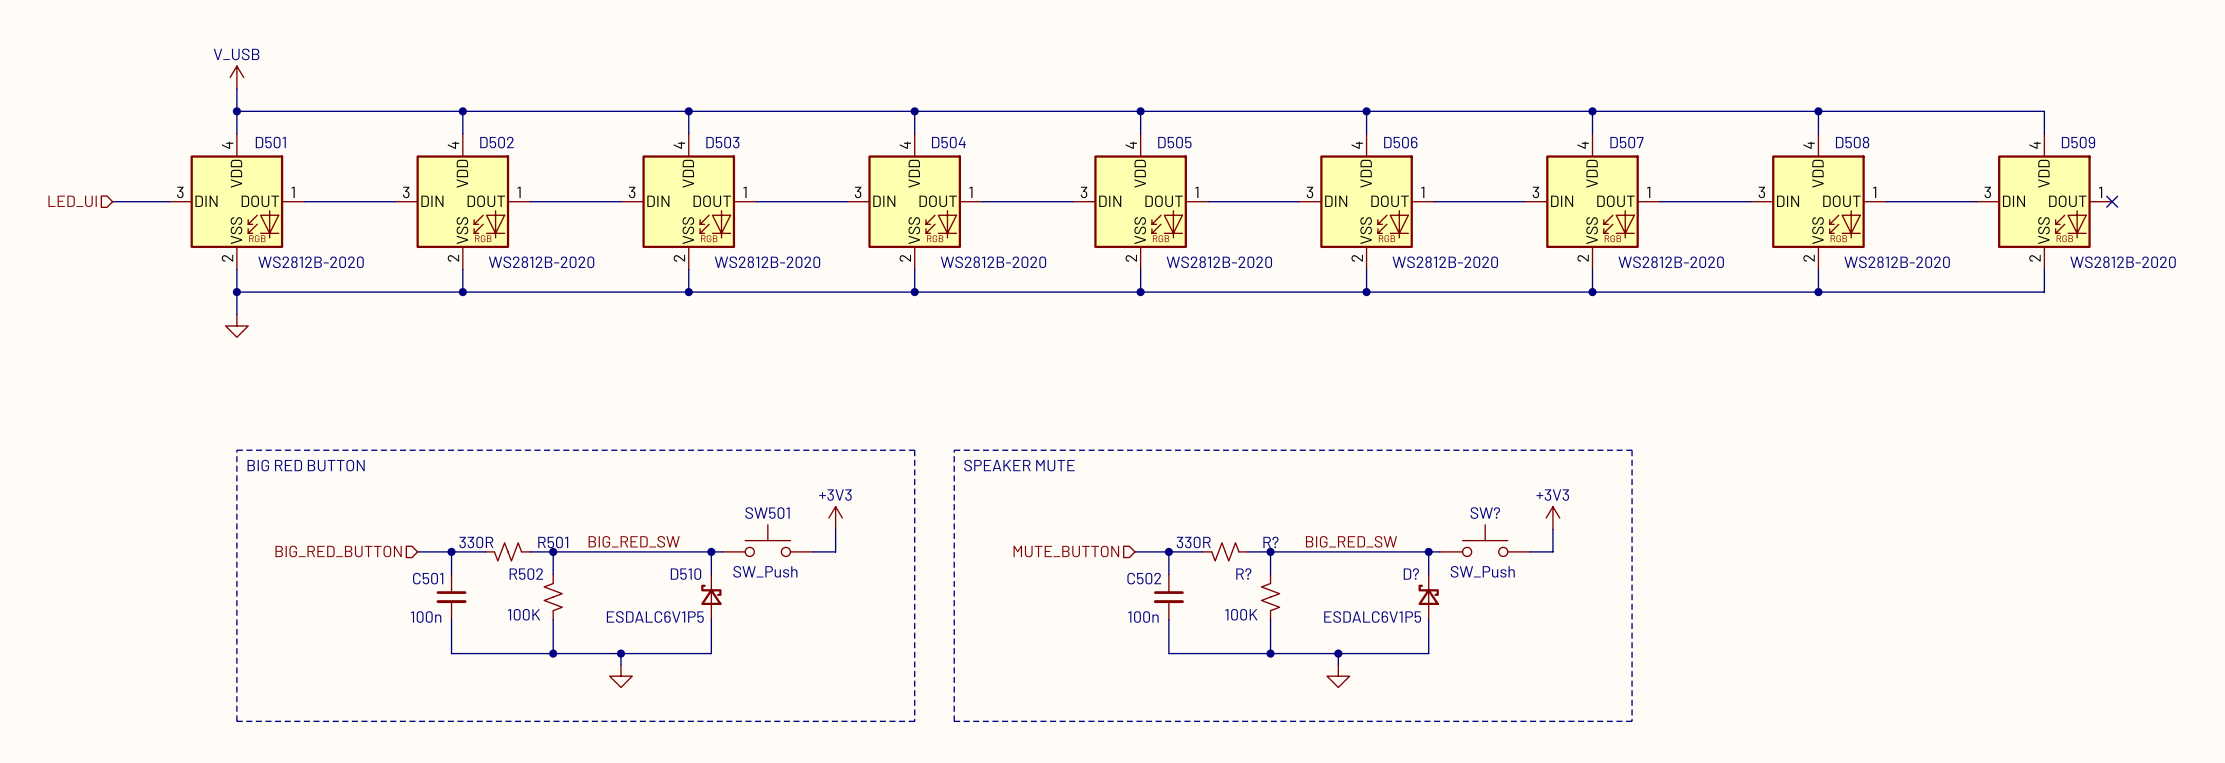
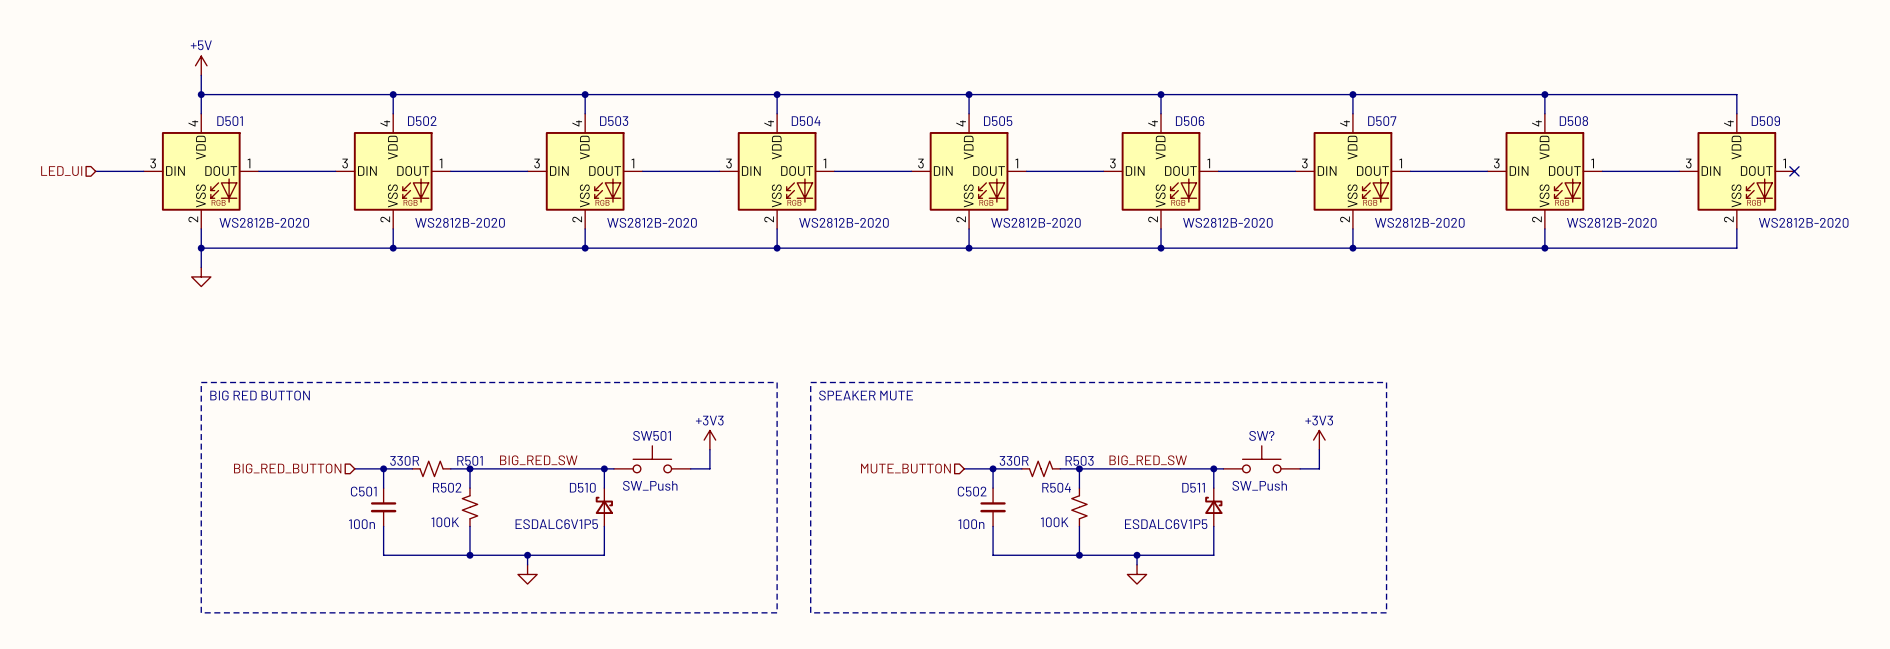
power symbol: V_USB (236, 77) -> +5V (201, 65)
R? name: R? (1270, 542) -> R503 (1079, 460)
R? name: R? (1243, 574) -> R504 (1056, 487)
D? name: D? (1411, 574) -> D511 (1193, 487)

